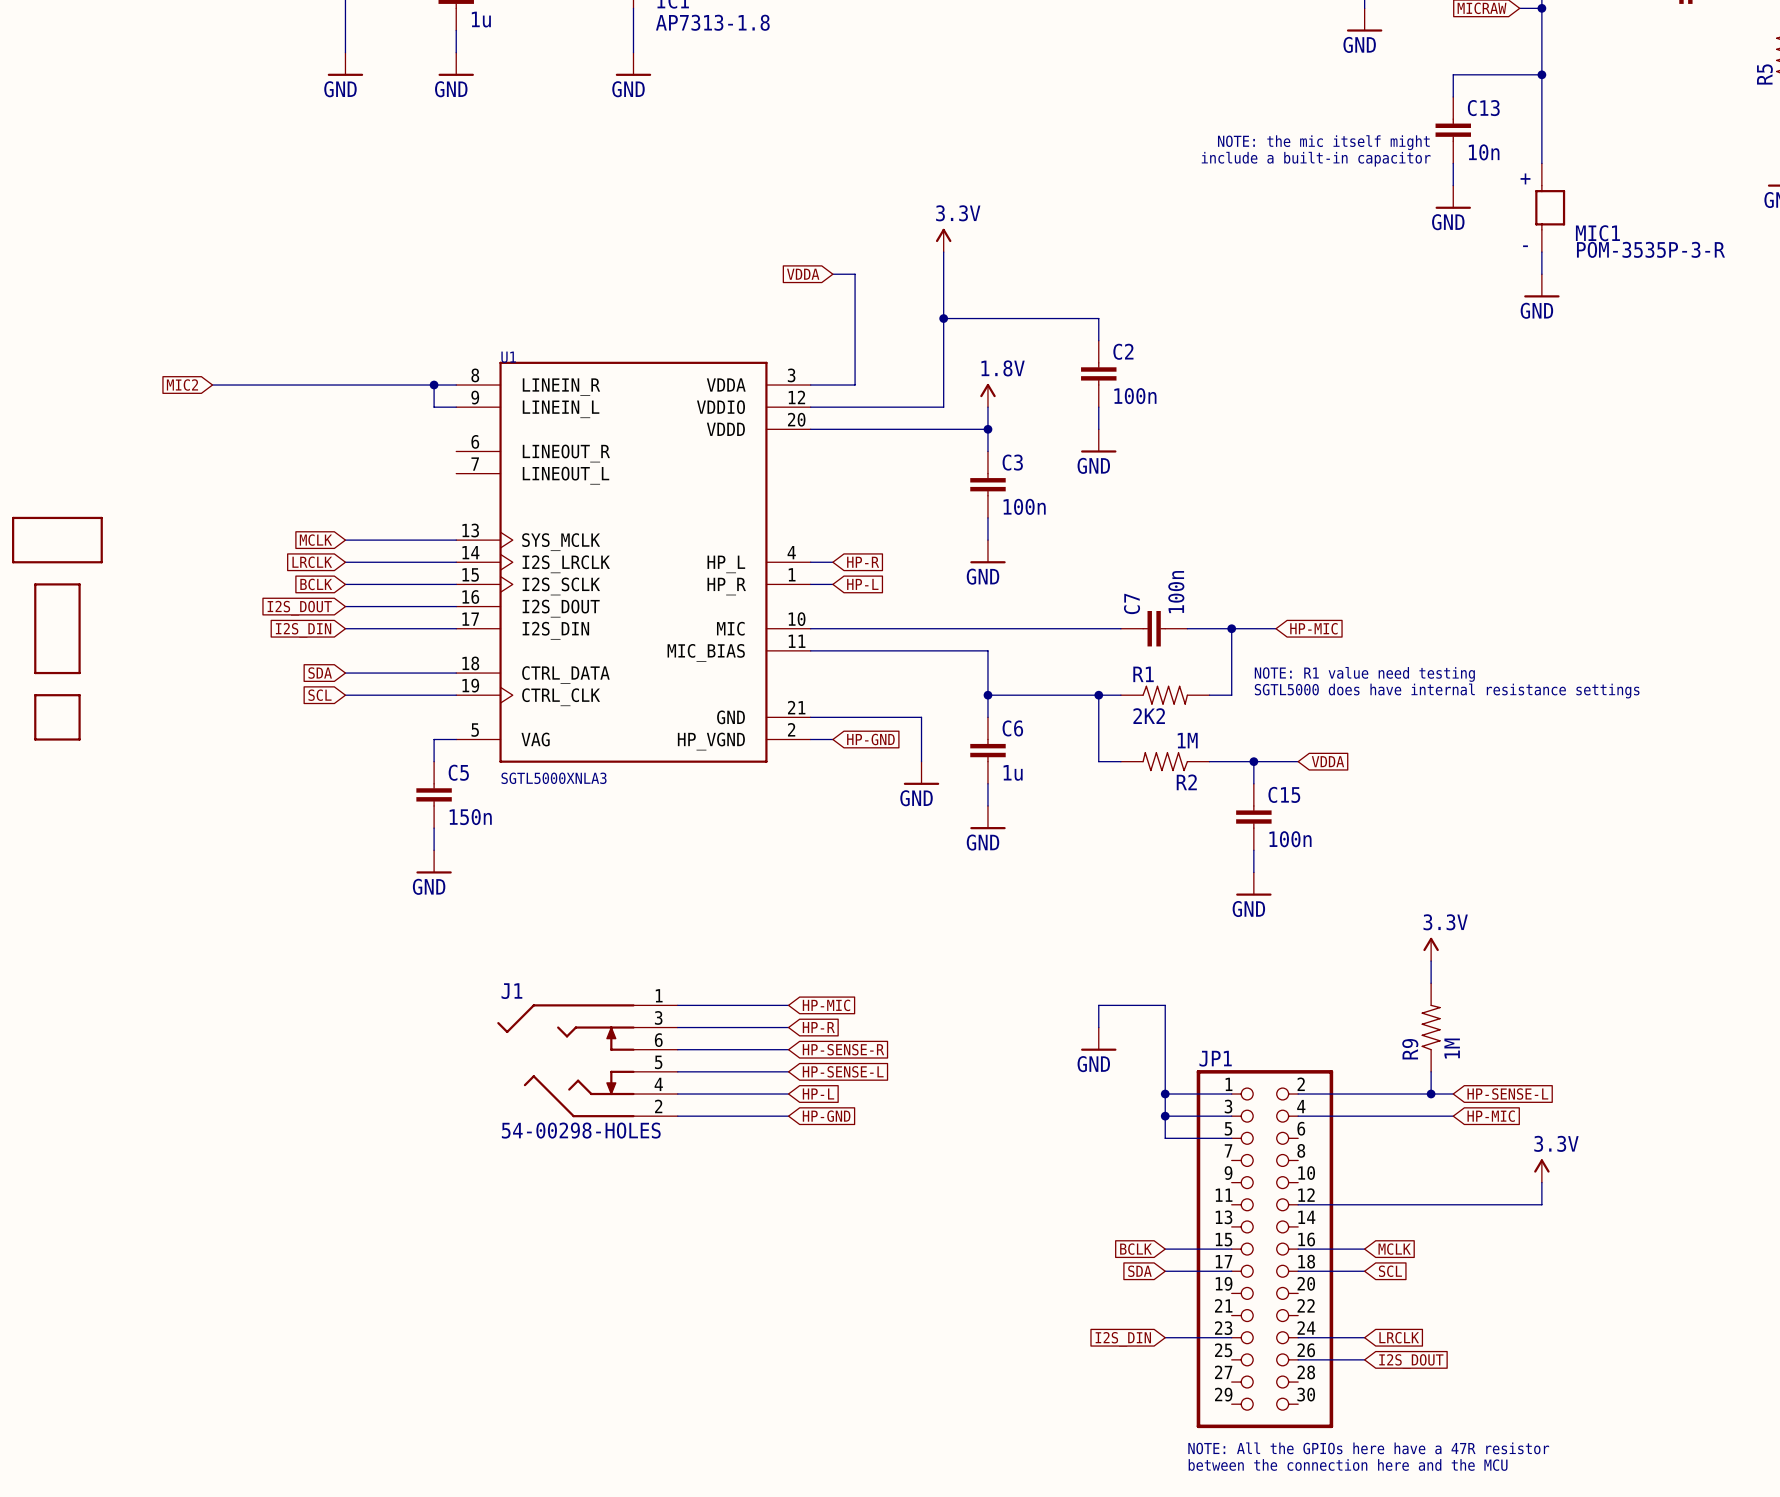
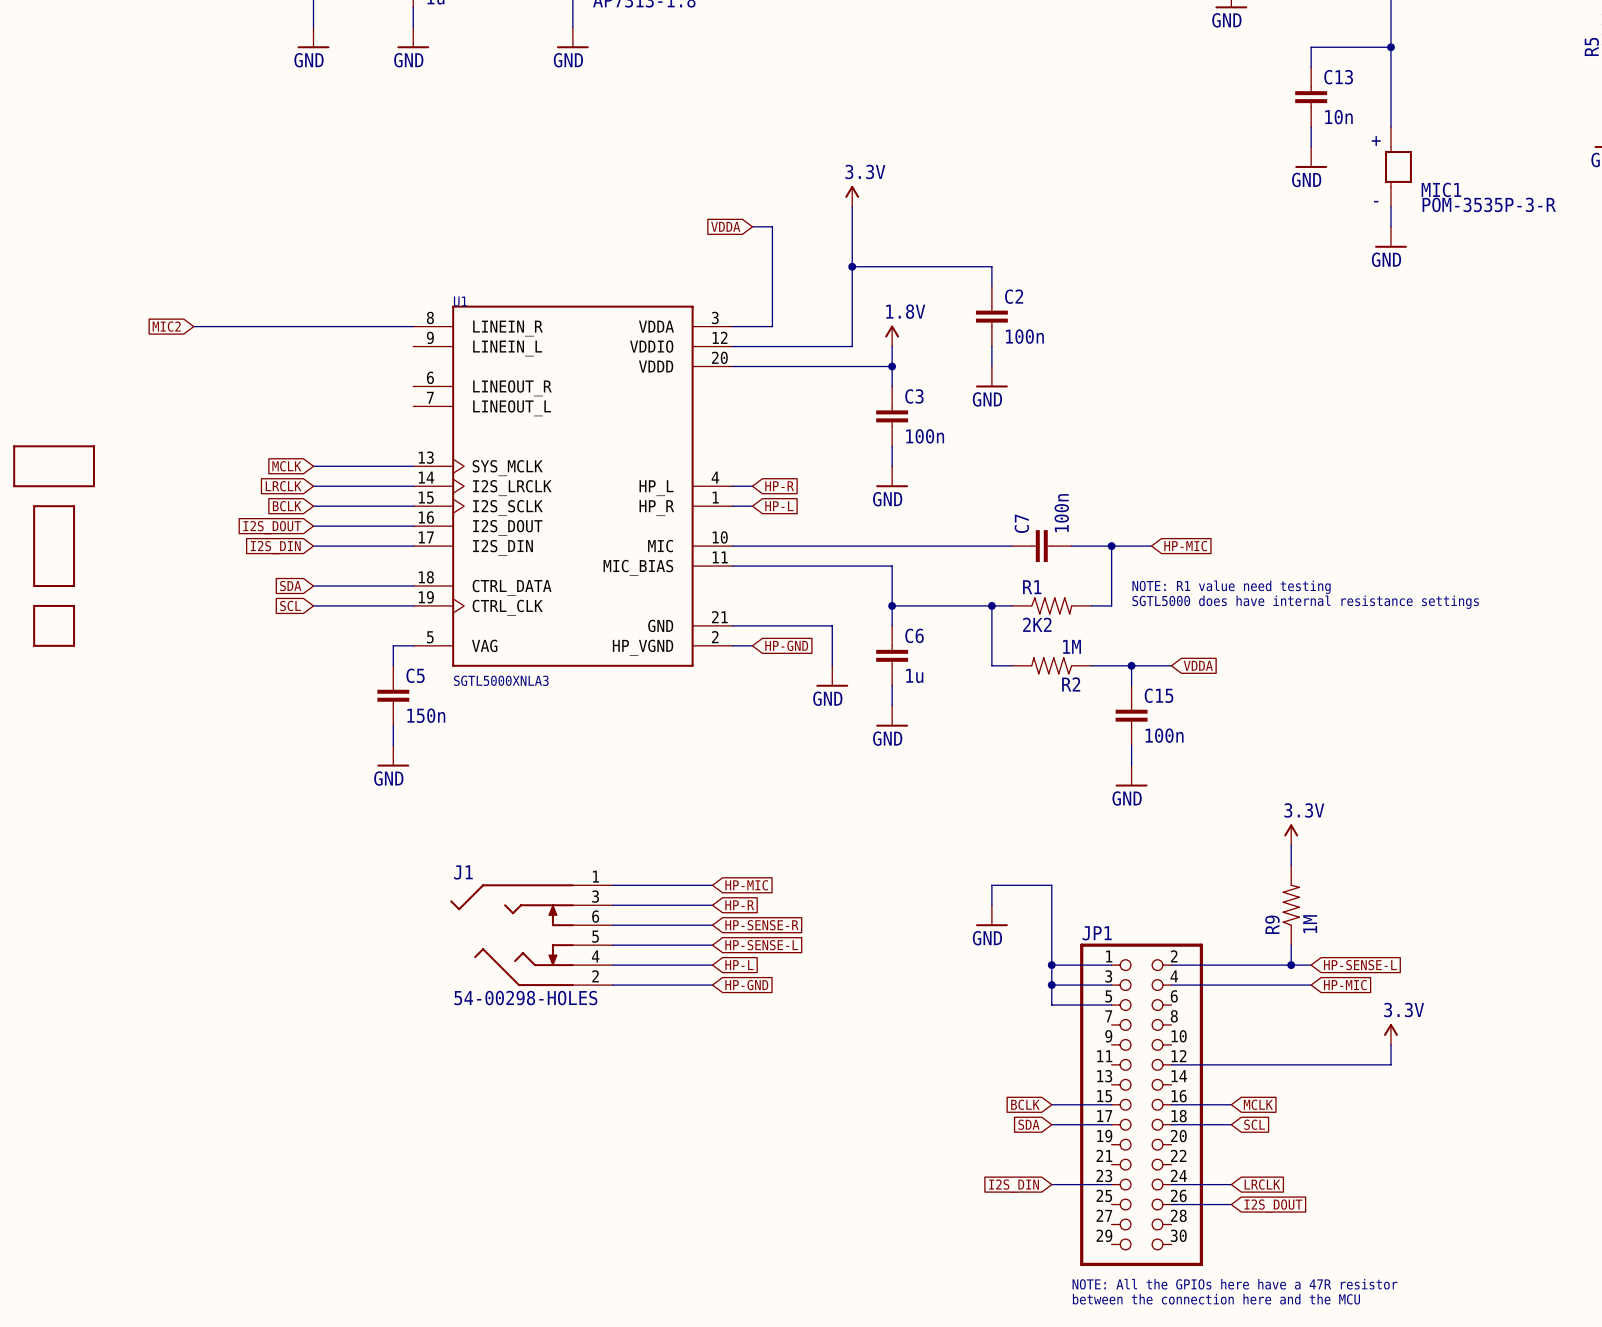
text: NOTE: the mic itself might (1323, 142) -> none
text: include a built-in capacitor (1316, 159) -> none
wire: (434, 385) (434, 407) (456, 407) -> none
junction: (434, 385) -> none

